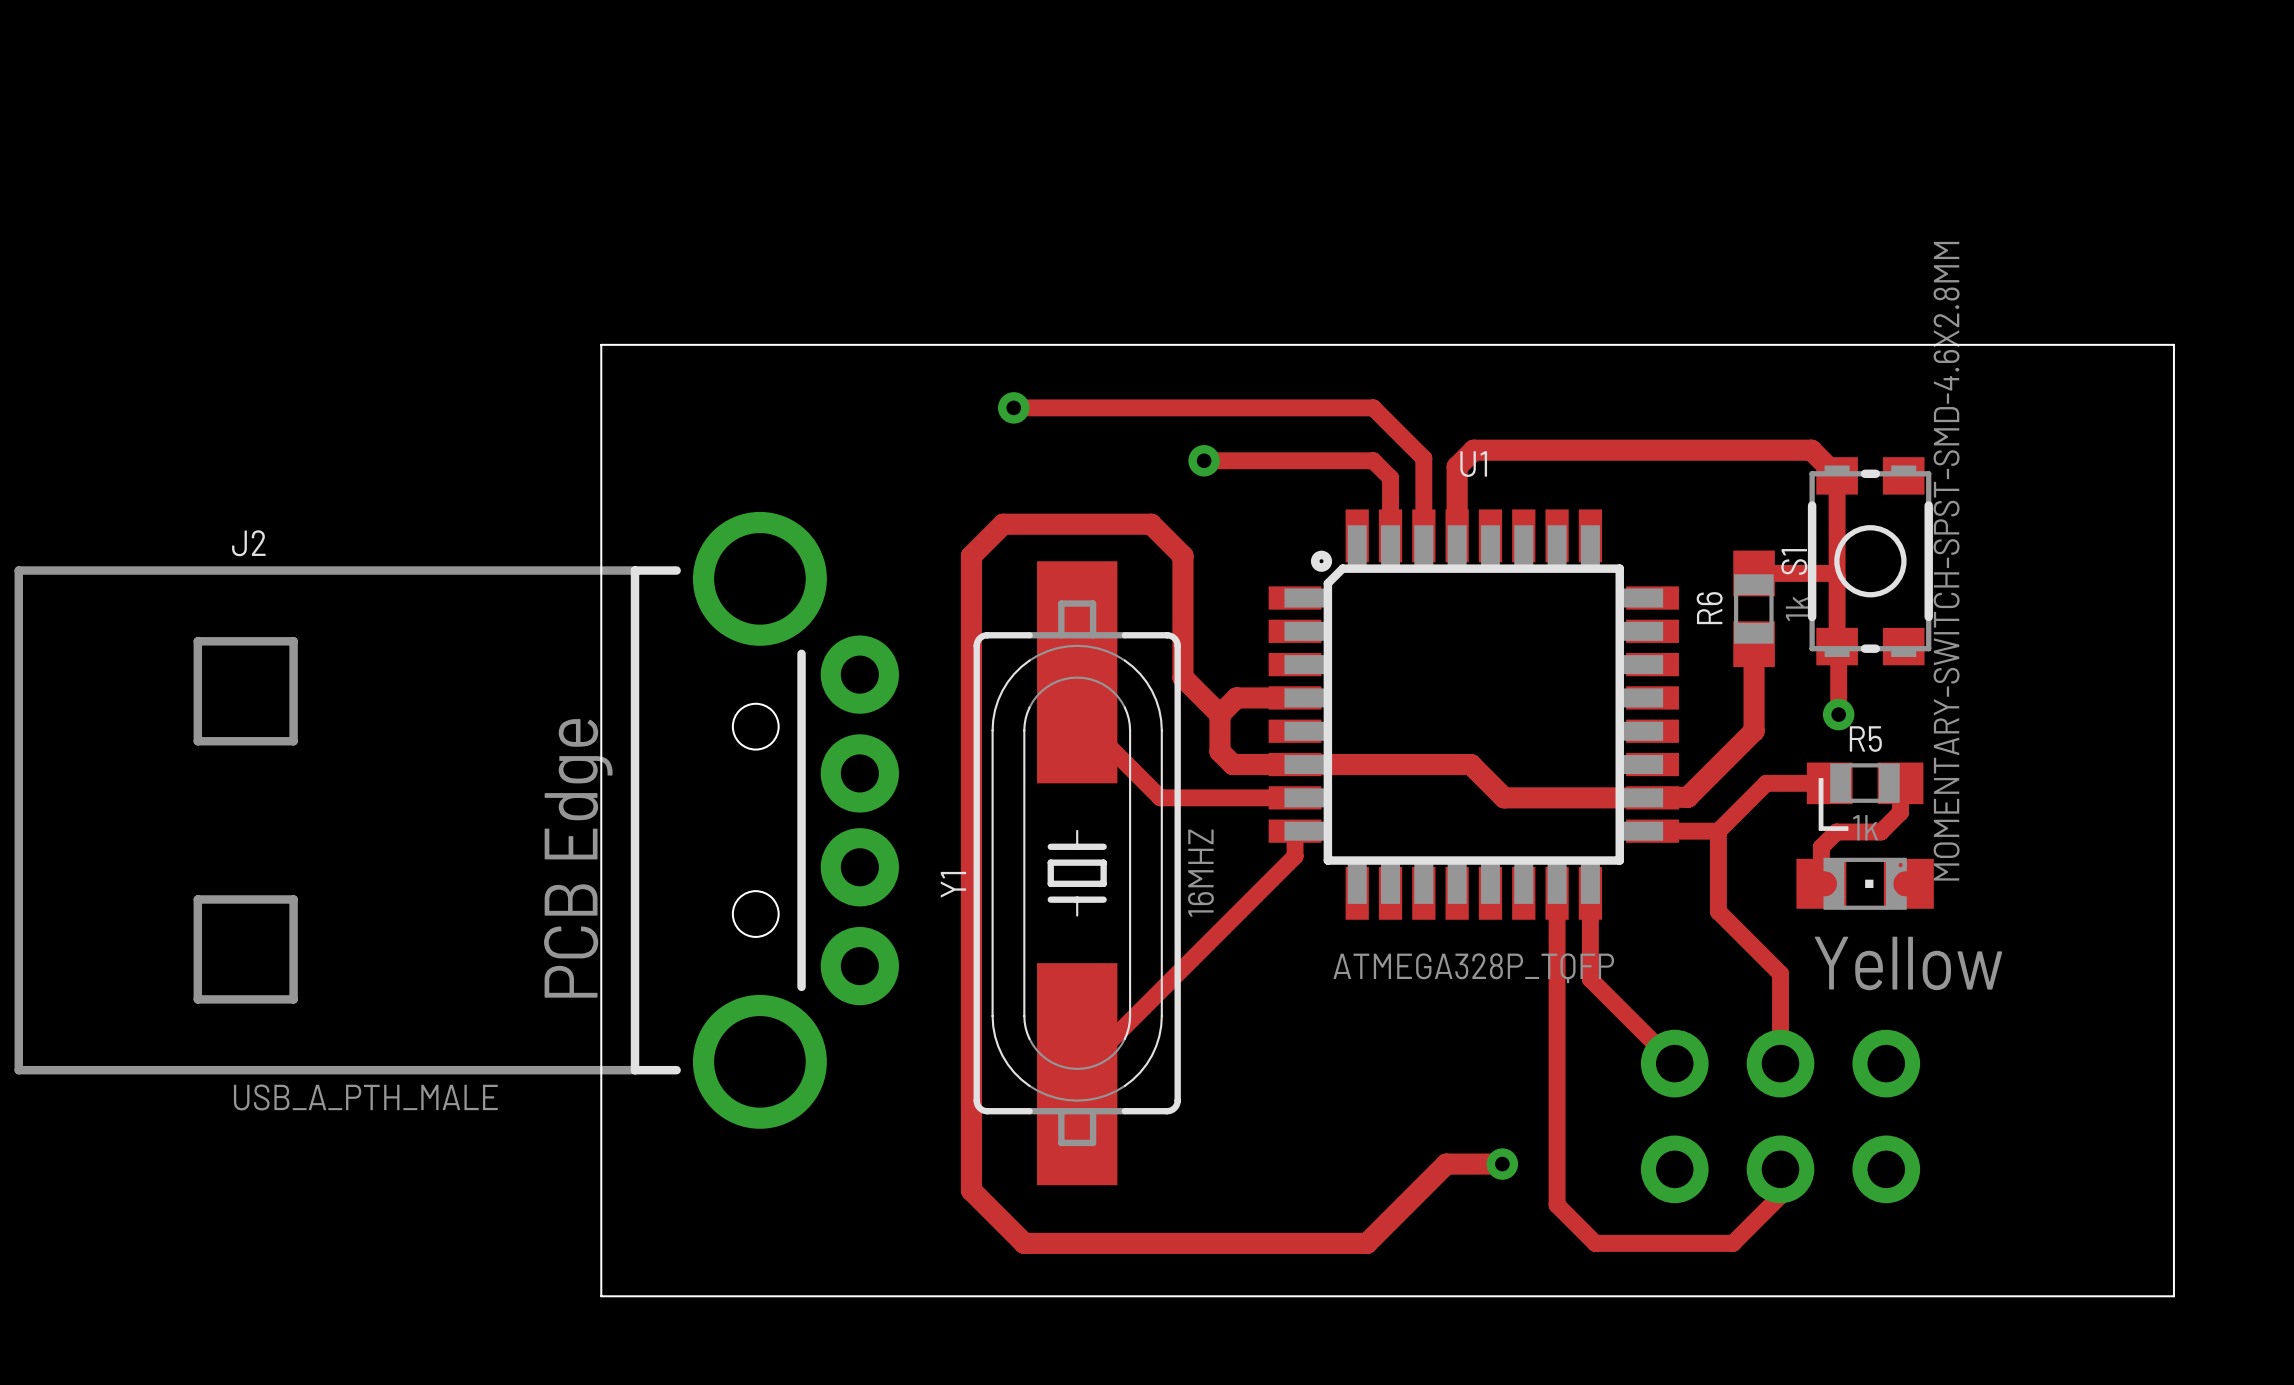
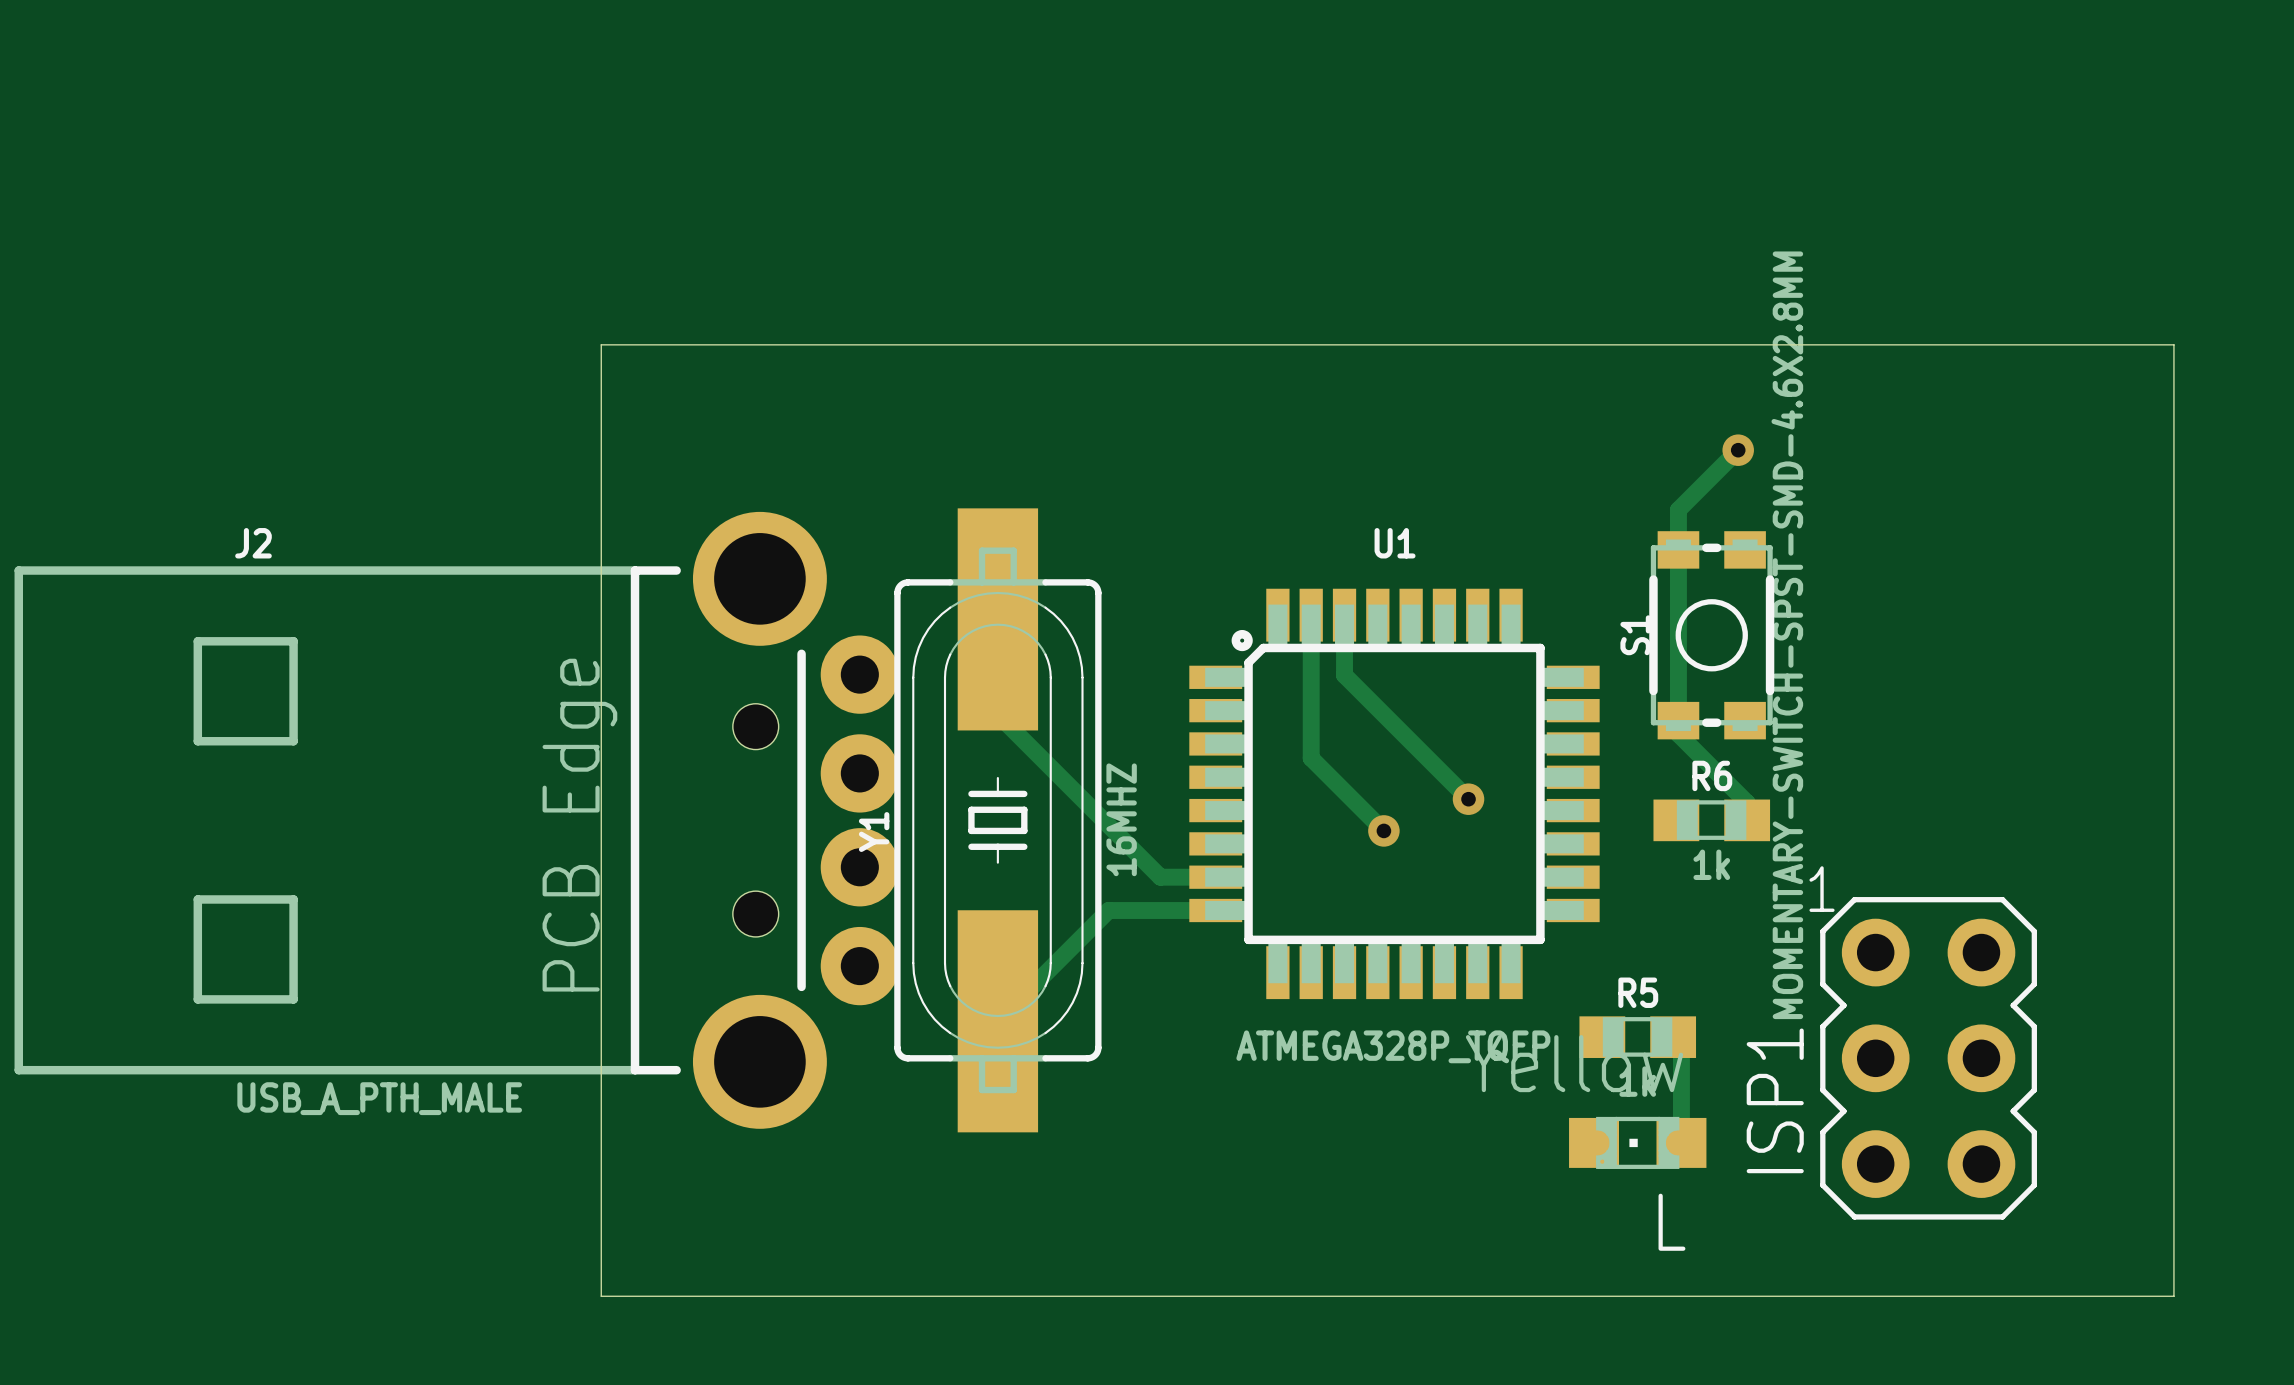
track: (1013, 407) (1373, 407) (1423, 458) (1423, 535) -> none
via: (1013, 407) -> none
track: none -> (1738, 450) (1678, 509) (1678, 734) (1747, 802) (1747, 824)
via: none -> (1738, 450)
track: (1204, 460) (1373, 460) (1390, 477) (1390, 535) -> none
via: (1204, 460) -> none
track: (1457, 535) (1457, 466) (1473, 450) (1811, 450) (1837, 475) (1838, 714) -> none
S1 position: (1870, 561) -> (1711, 635)
track: (1754, 573) (1833, 573) (1837, 577) -> none
R6 rotation: 0° (1754, 608) -> 90° clockwise (1711, 820)
R6 position: (1754, 608) -> (1711, 820)
track: none -> (1311, 615) (1311, 758) (1383, 830)
track: none -> (1344, 615) (1344, 675) (1468, 799)
track: none -> (997, 619) (997, 714) (1160, 877) (1215, 877)
track: (1754, 644) (1754, 731) (1687, 797) (1653, 797) -> none
track: (1077, 672) (1077, 714) (1160, 797) (1295, 797) -> none
track: (1295, 697) (1236, 697) (1219, 714) -> none
track: (1219, 714) (1219, 751) (1232, 764) (1470, 764) (1504, 797) (1652, 797) -> none
track: (1219, 714) (1182, 677) (1182, 555) (1151, 524) (1003, 524) (971, 555) (971, 1190) (1024, 1243) (1366, 1243) (1446, 1164) (1502, 1164) -> none
U1 position: (1473, 714) -> (1394, 793)
via: (1838, 714) -> none
track: (1829, 783) (1766, 783) (1718, 831) -> none
R5 position: (1865, 783) -> (1637, 1037)
track: (1908, 791) (1900, 783) (1900, 812) (1880, 831) (1836, 831) (1821, 847) (1821, 883) -> none
via: none -> (1468, 799)
via: none -> (1383, 830)
track: (1295, 831) (1295, 856) (1077, 1074) -> none
track: (1652, 831) (1718, 831) -> none
track: (1718, 831) (1718, 911) (1780, 973) (1780, 1063) -> none
Y1 position: (1077, 873) -> (997, 820)
L rotation: 0° (1865, 883) -> 180° (1637, 1142)
L position: (1865, 883) -> (1637, 1142)
track: (1557, 893) (1557, 1205) (1595, 1243) (1732, 1243) (1780, 1195) (1780, 1169) -> none
track: (1590, 893) (1590, 979) (1674, 1063) -> none
track: none -> (1215, 910) (1108, 910) (997, 1021)
track: none -> (1673, 1037) (1681, 1045) (1681, 1142)
ISP1 side: bottom (1780, 1116) -> top (1928, 1058)
via: (1502, 1164) -> none

